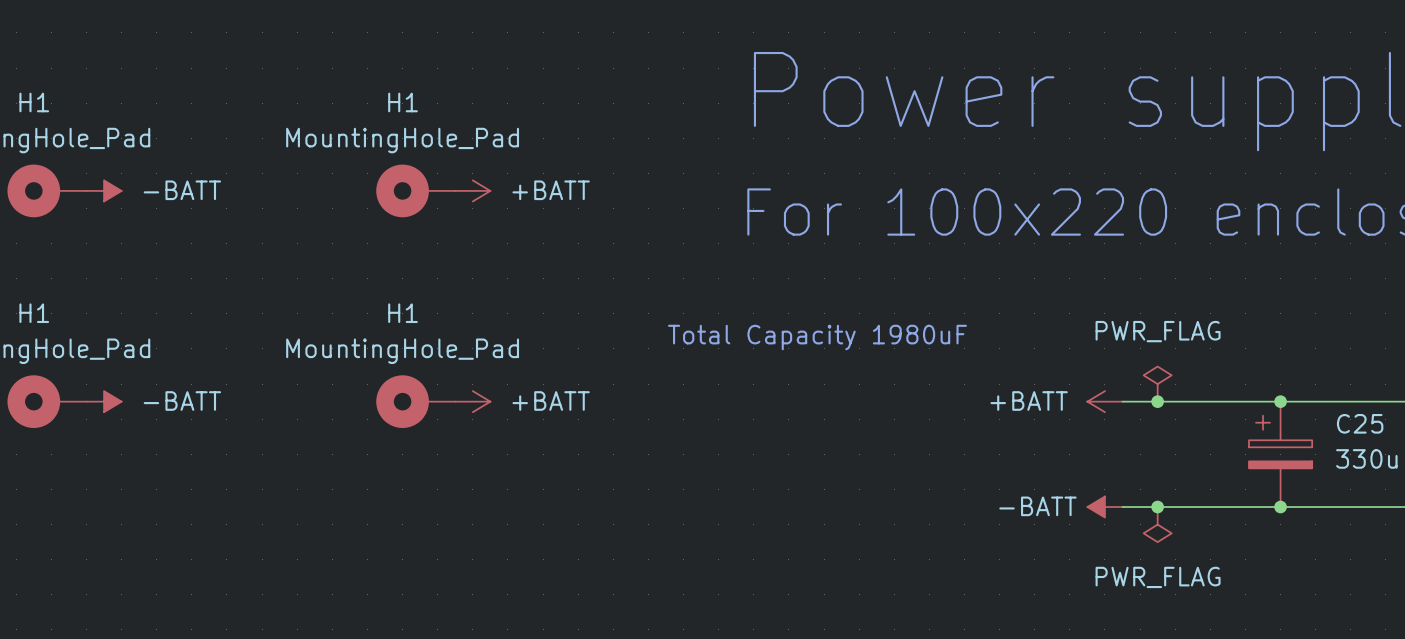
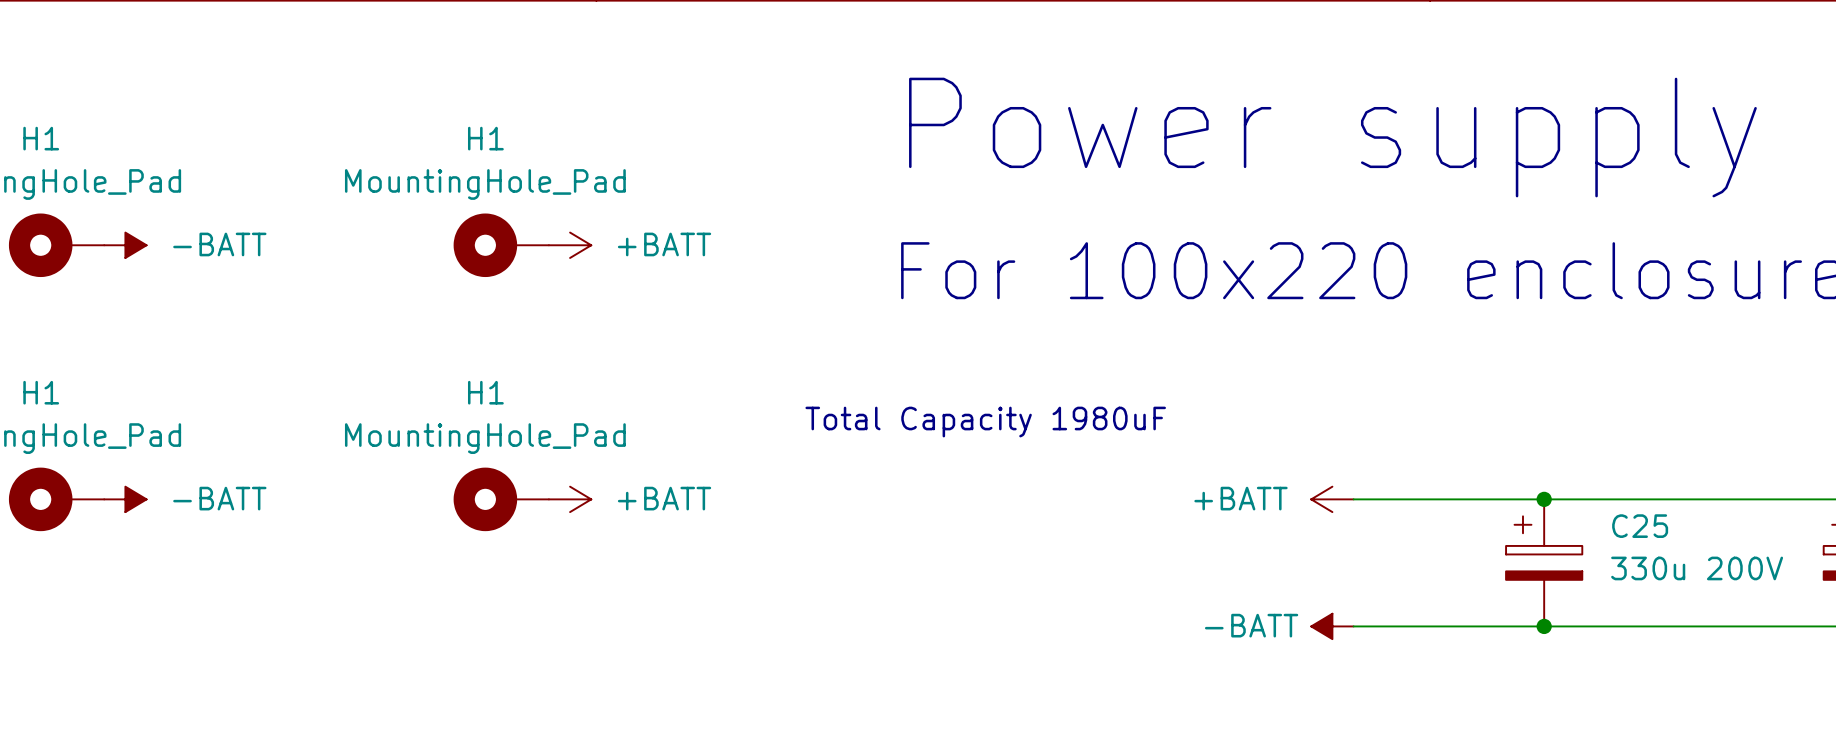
power symbol: PWR_FLAG (1157, 384) -> none
junction: (1157, 401) -> none
junction: (1157, 507) -> none
power symbol: PWR_FLAG (1157, 524) -> none

